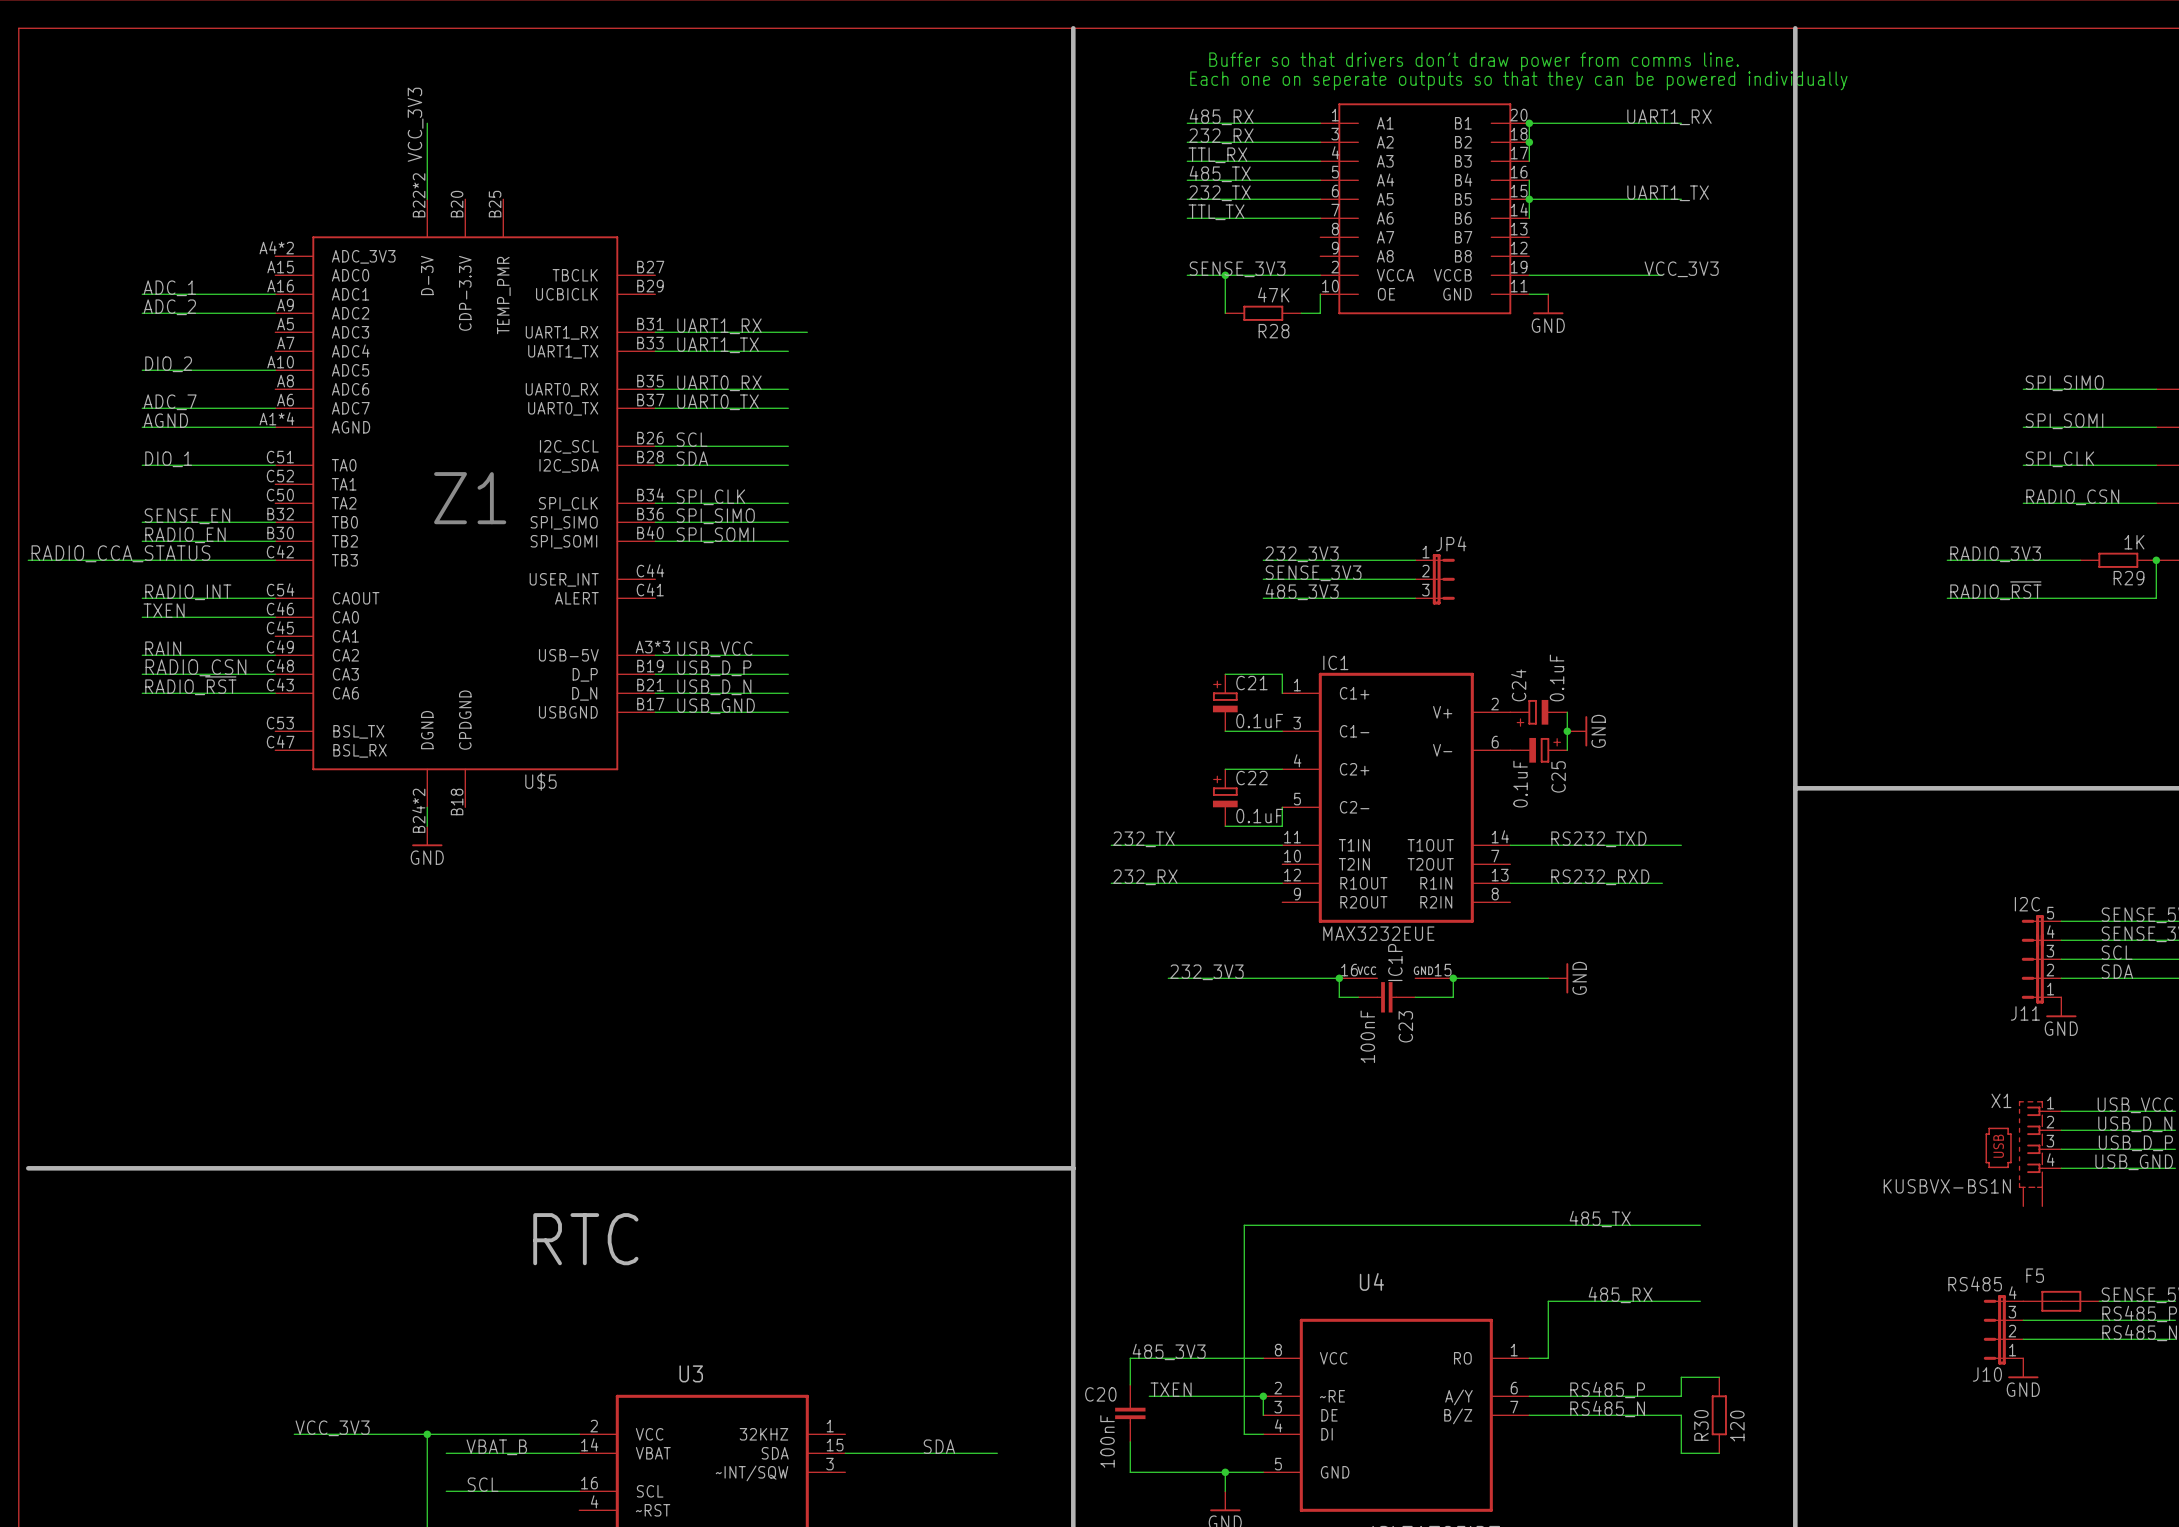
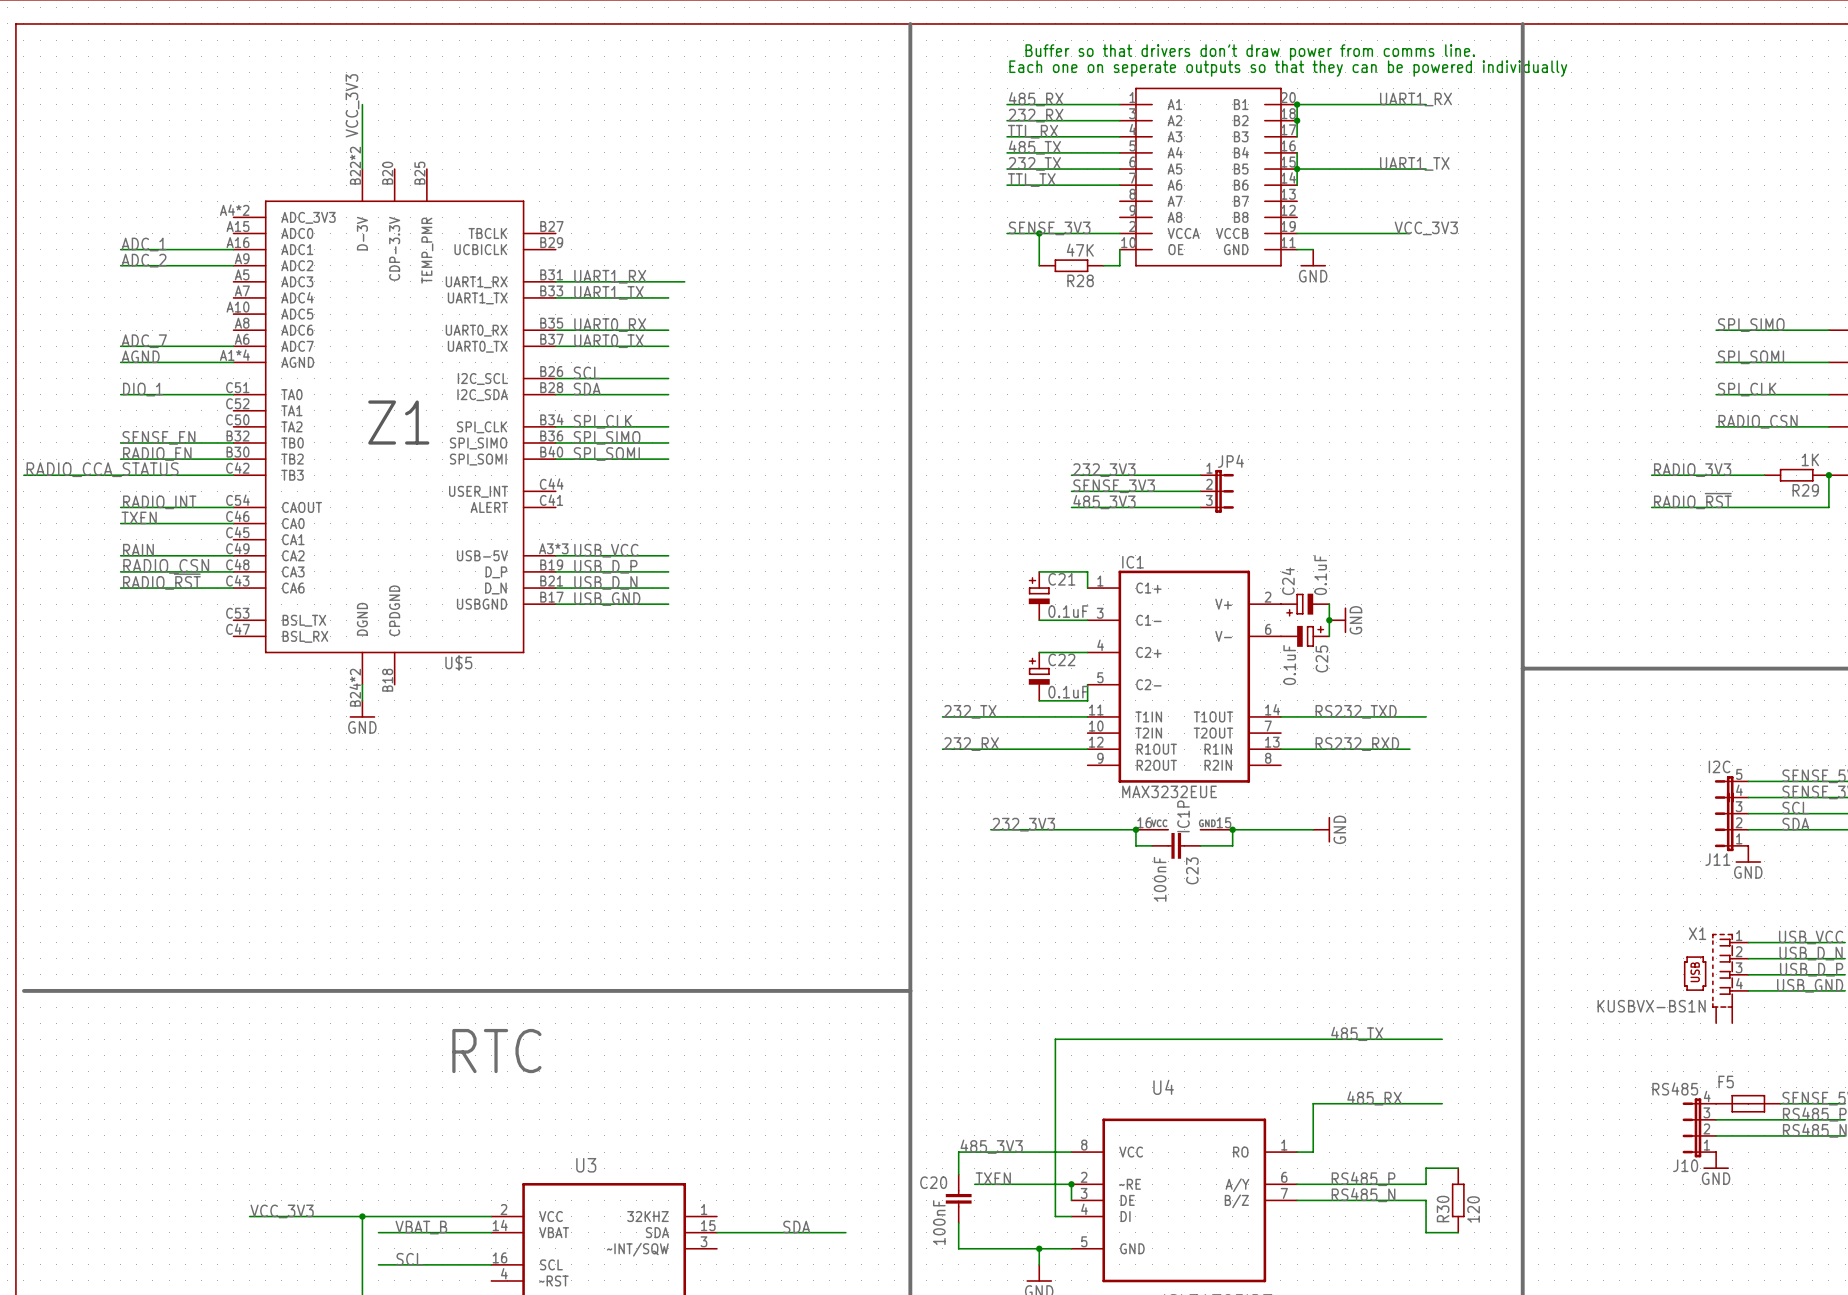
label: DIO_2 (168, 364) -> none
wire: (142, 370) (275, 370) -> none

